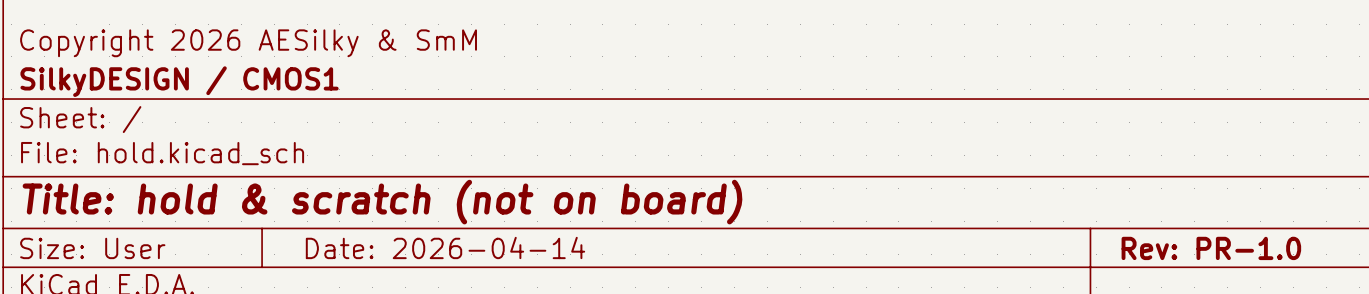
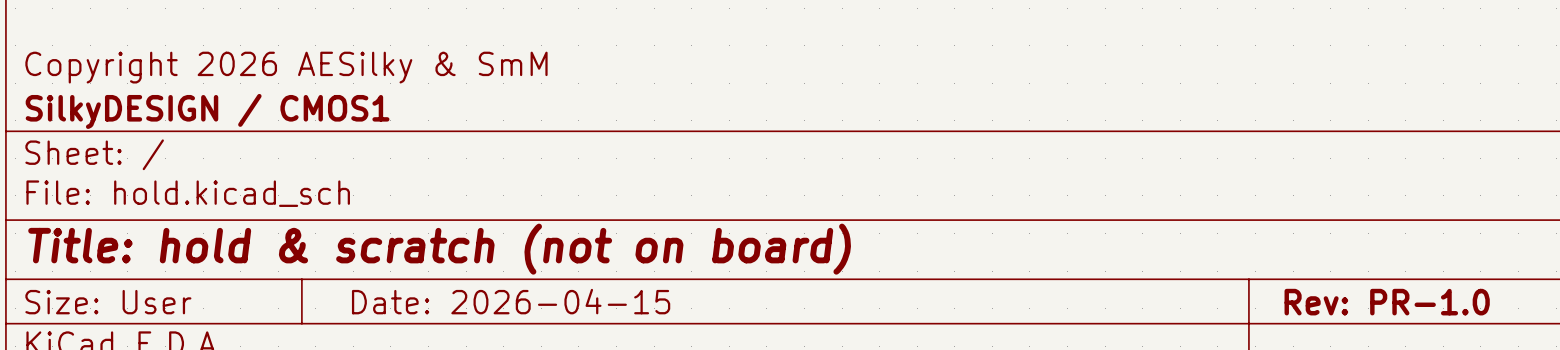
title block: Date: 2026-04-14 (445, 247) -> Date: 2026-04-15 (511, 301)

